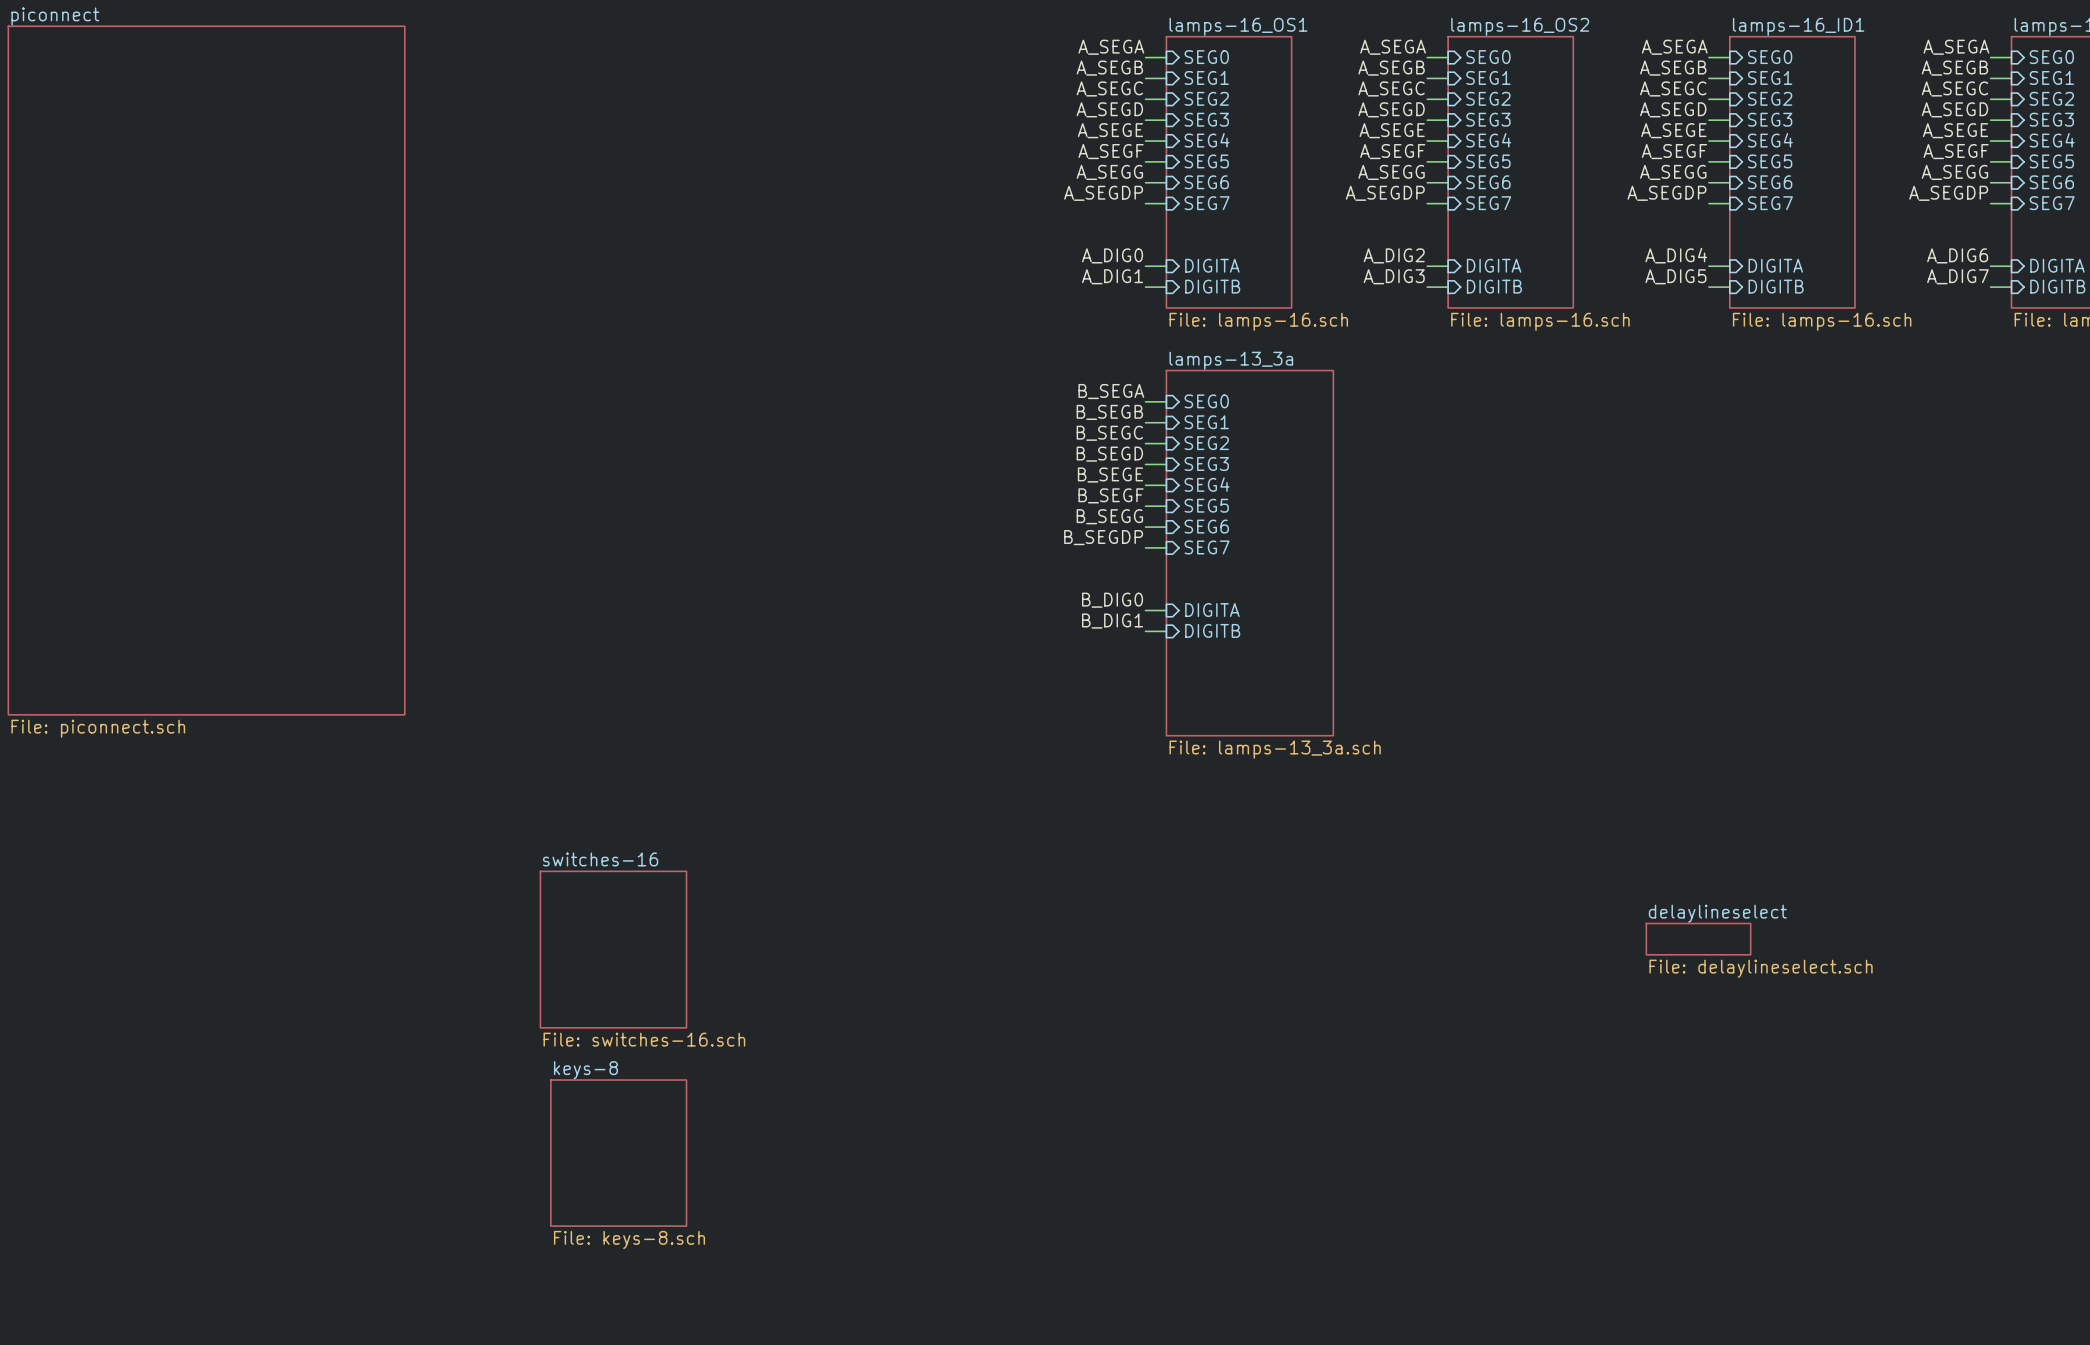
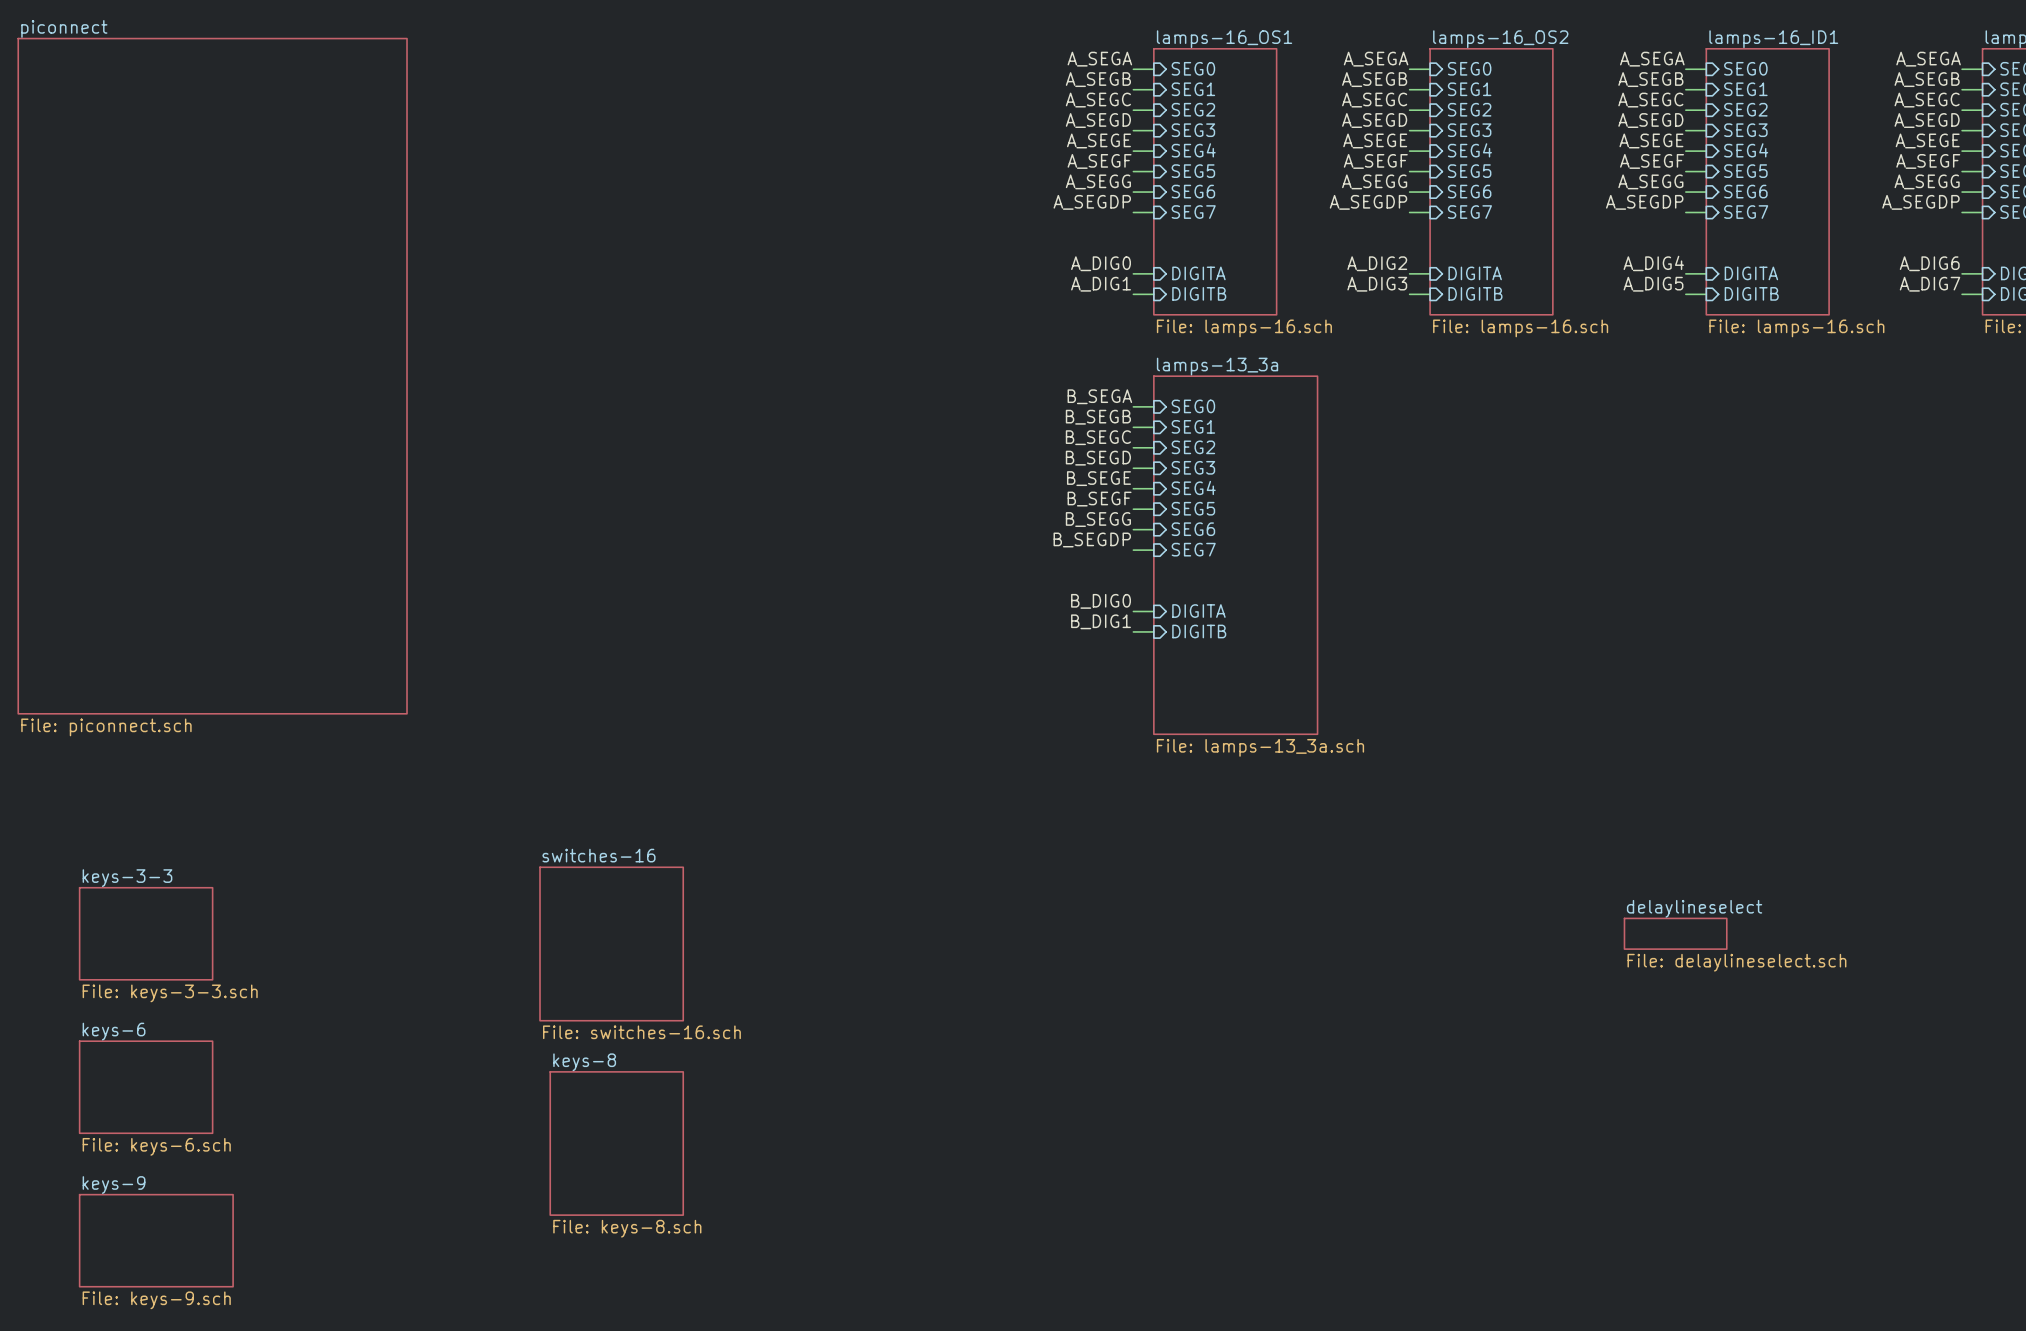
sheet keys-3-3: none -> File: keys-3-3.sch (146, 933)
sheet keys-6: none -> File: keys-6.sch (146, 1087)
sheet keys-9: none -> File: keys-9.sch (156, 1240)

